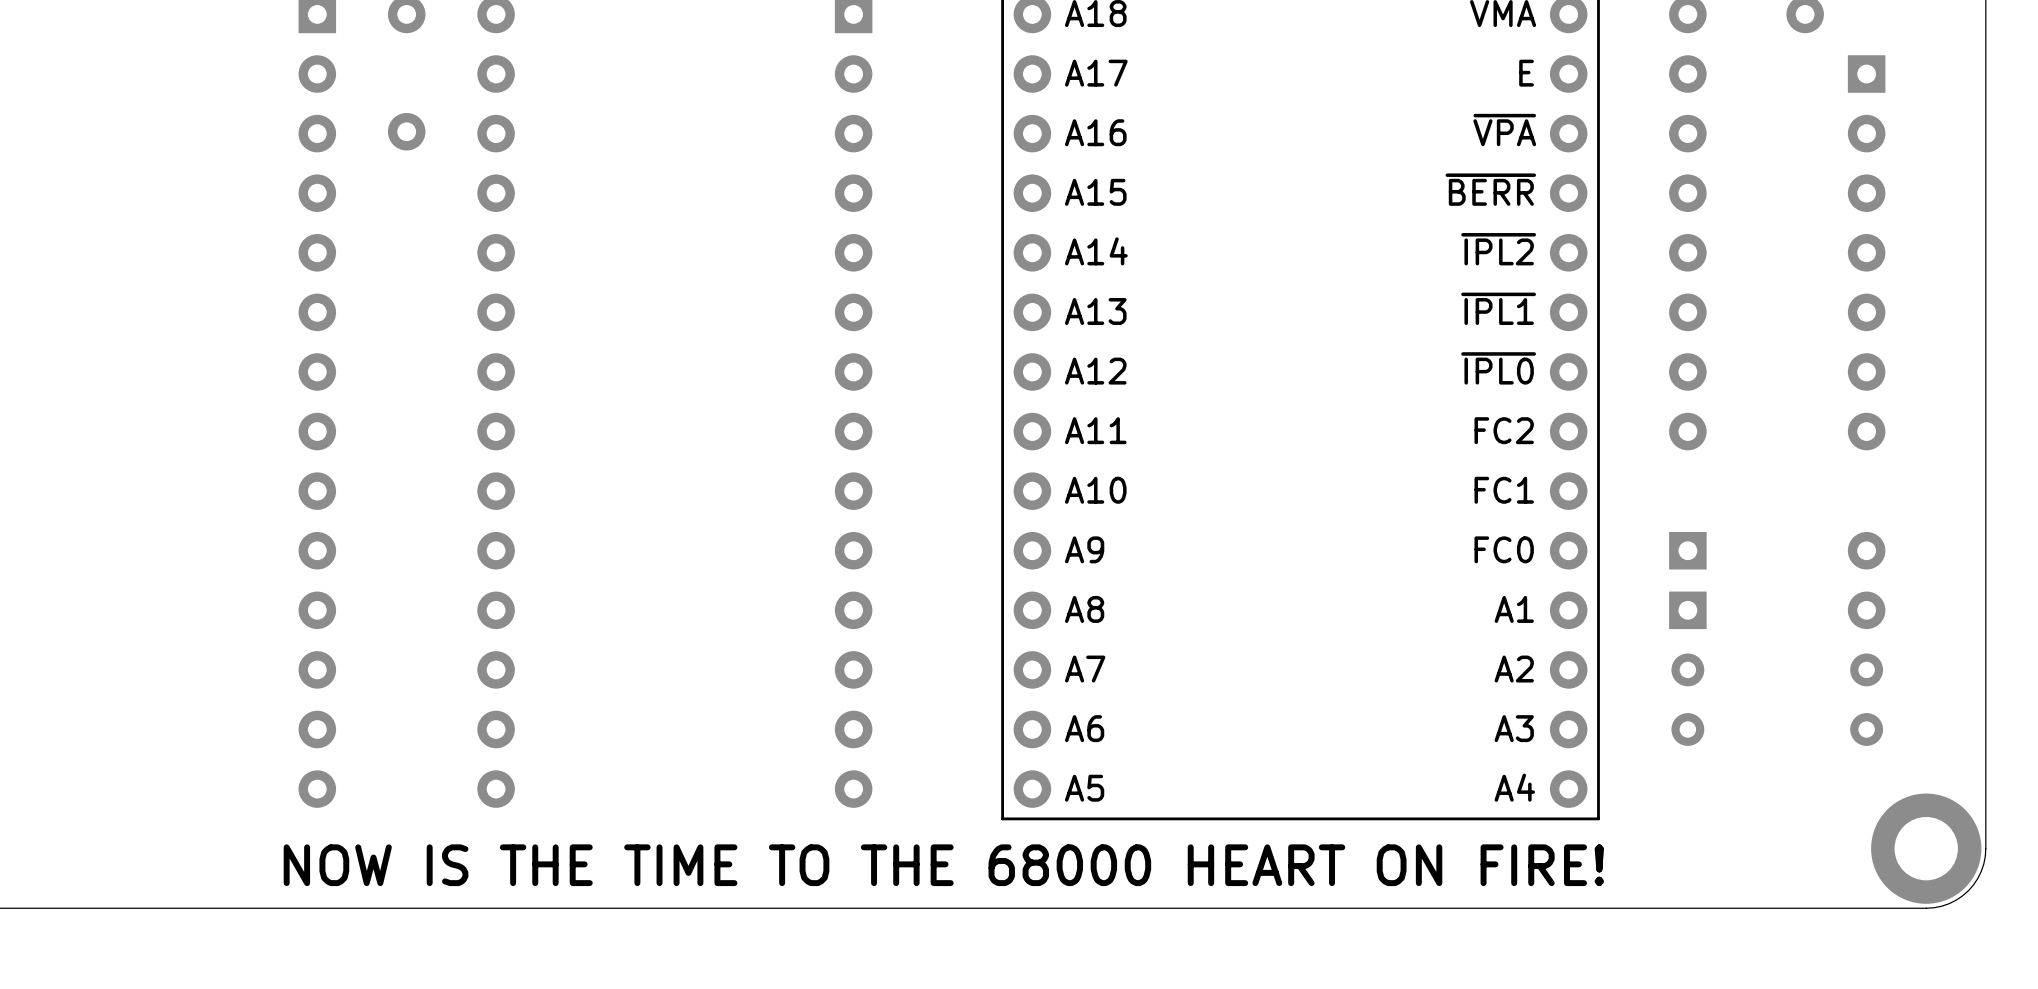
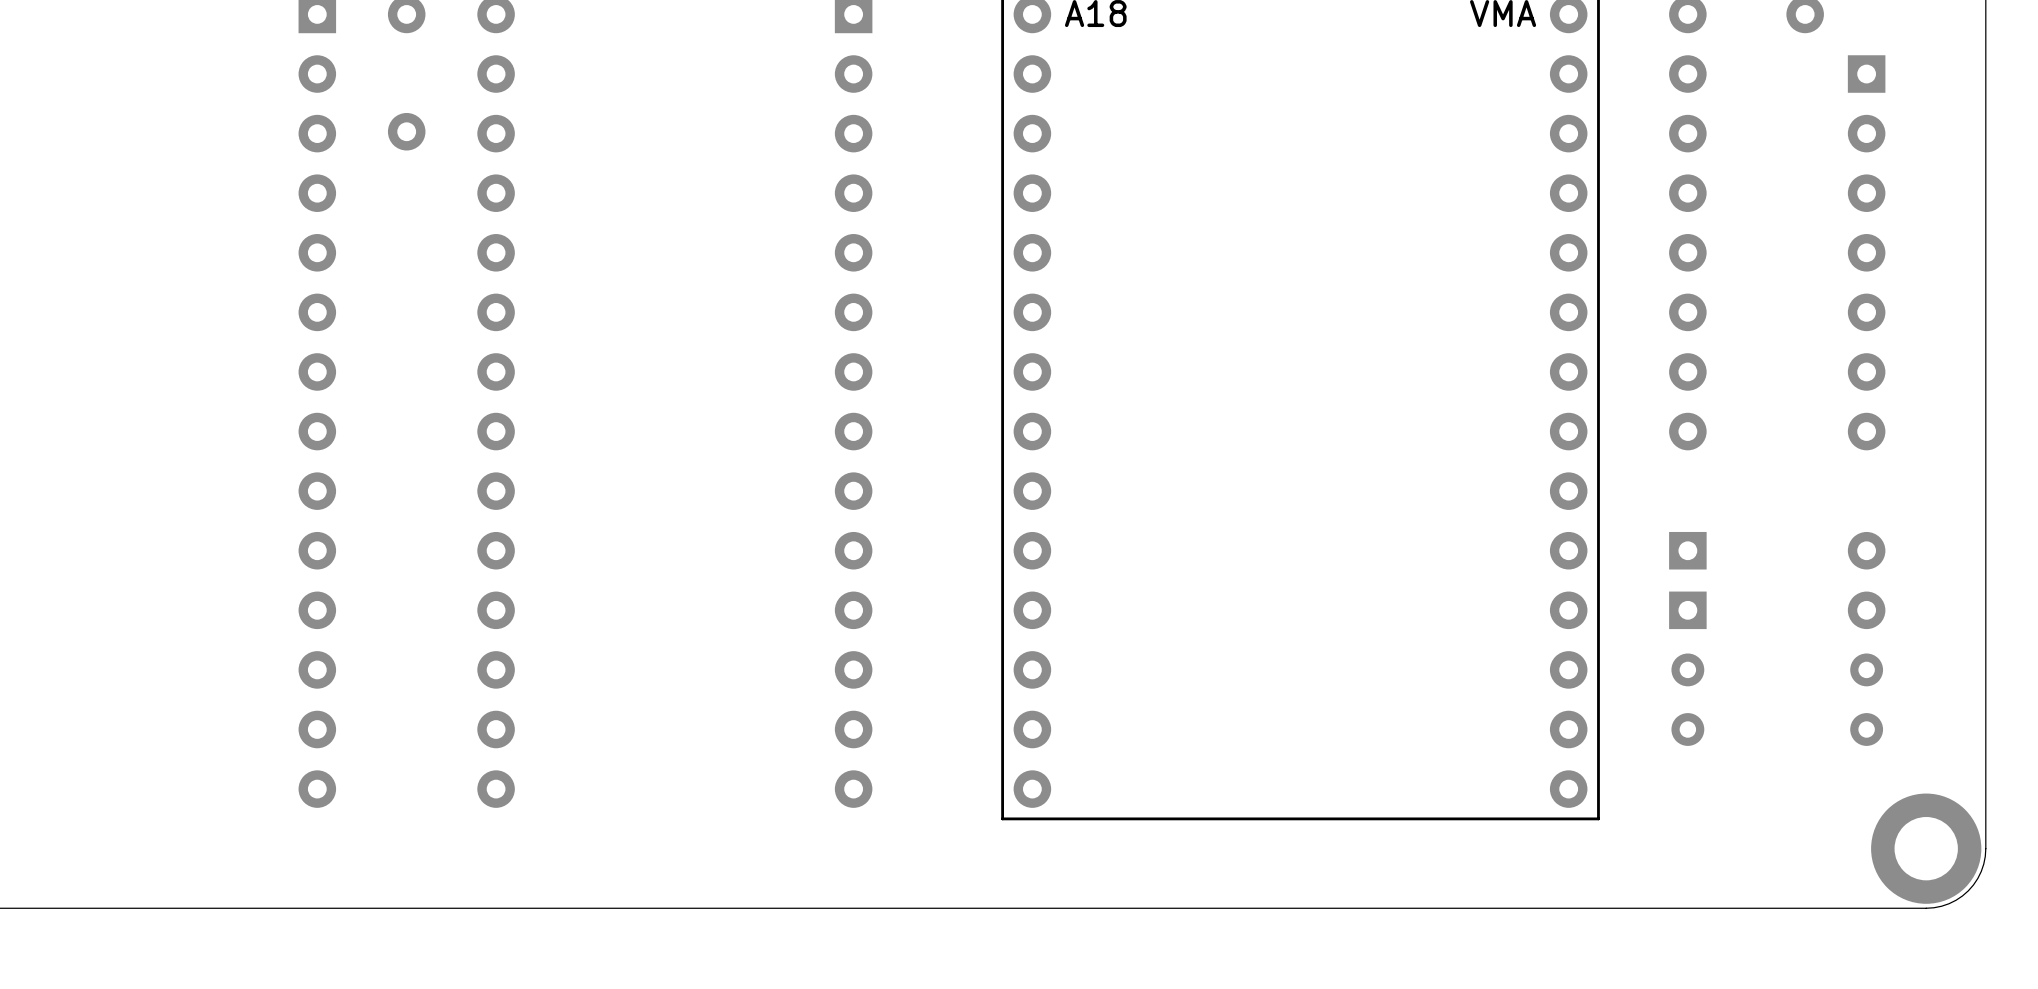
text: A17 (1096, 73) -> none
text: E (1526, 73) -> none
text: ~{VPA} (1504, 130) -> none
text: A16 (1095, 132) -> none
text: ~{BERR} (1490, 189) -> none
text: A15 (1095, 192) -> none
text: ~{IPL2} (1498, 249) -> none
text: A14 (1096, 251) -> none
text: ~{IPL1} (1498, 308) -> none
text: A13 (1095, 311) -> none
text: ~{IPL0} (1498, 368) -> none
text: A12 (1095, 371) -> none
text: A11 (1095, 430) -> none
text: FC2 (1504, 430) -> none
text: A10 (1095, 490) -> none
text: FC1 (1504, 490) -> none
text: A9 (1084, 549) -> none
text: FC0 (1504, 549) -> none
text: A8 (1084, 609) -> none
text: A1 (1514, 609) -> none
text: A7 (1085, 669) -> none
text: A2 (1514, 669) -> none
text: A6 (1084, 728) -> none
text: A3 (1514, 728) -> none
text: A4 (1514, 787) -> none
text: A5 (1084, 788) -> none
text: NOW IS THE TIME TO THE 68000 HEART ON FIRE! (943, 865) -> none

